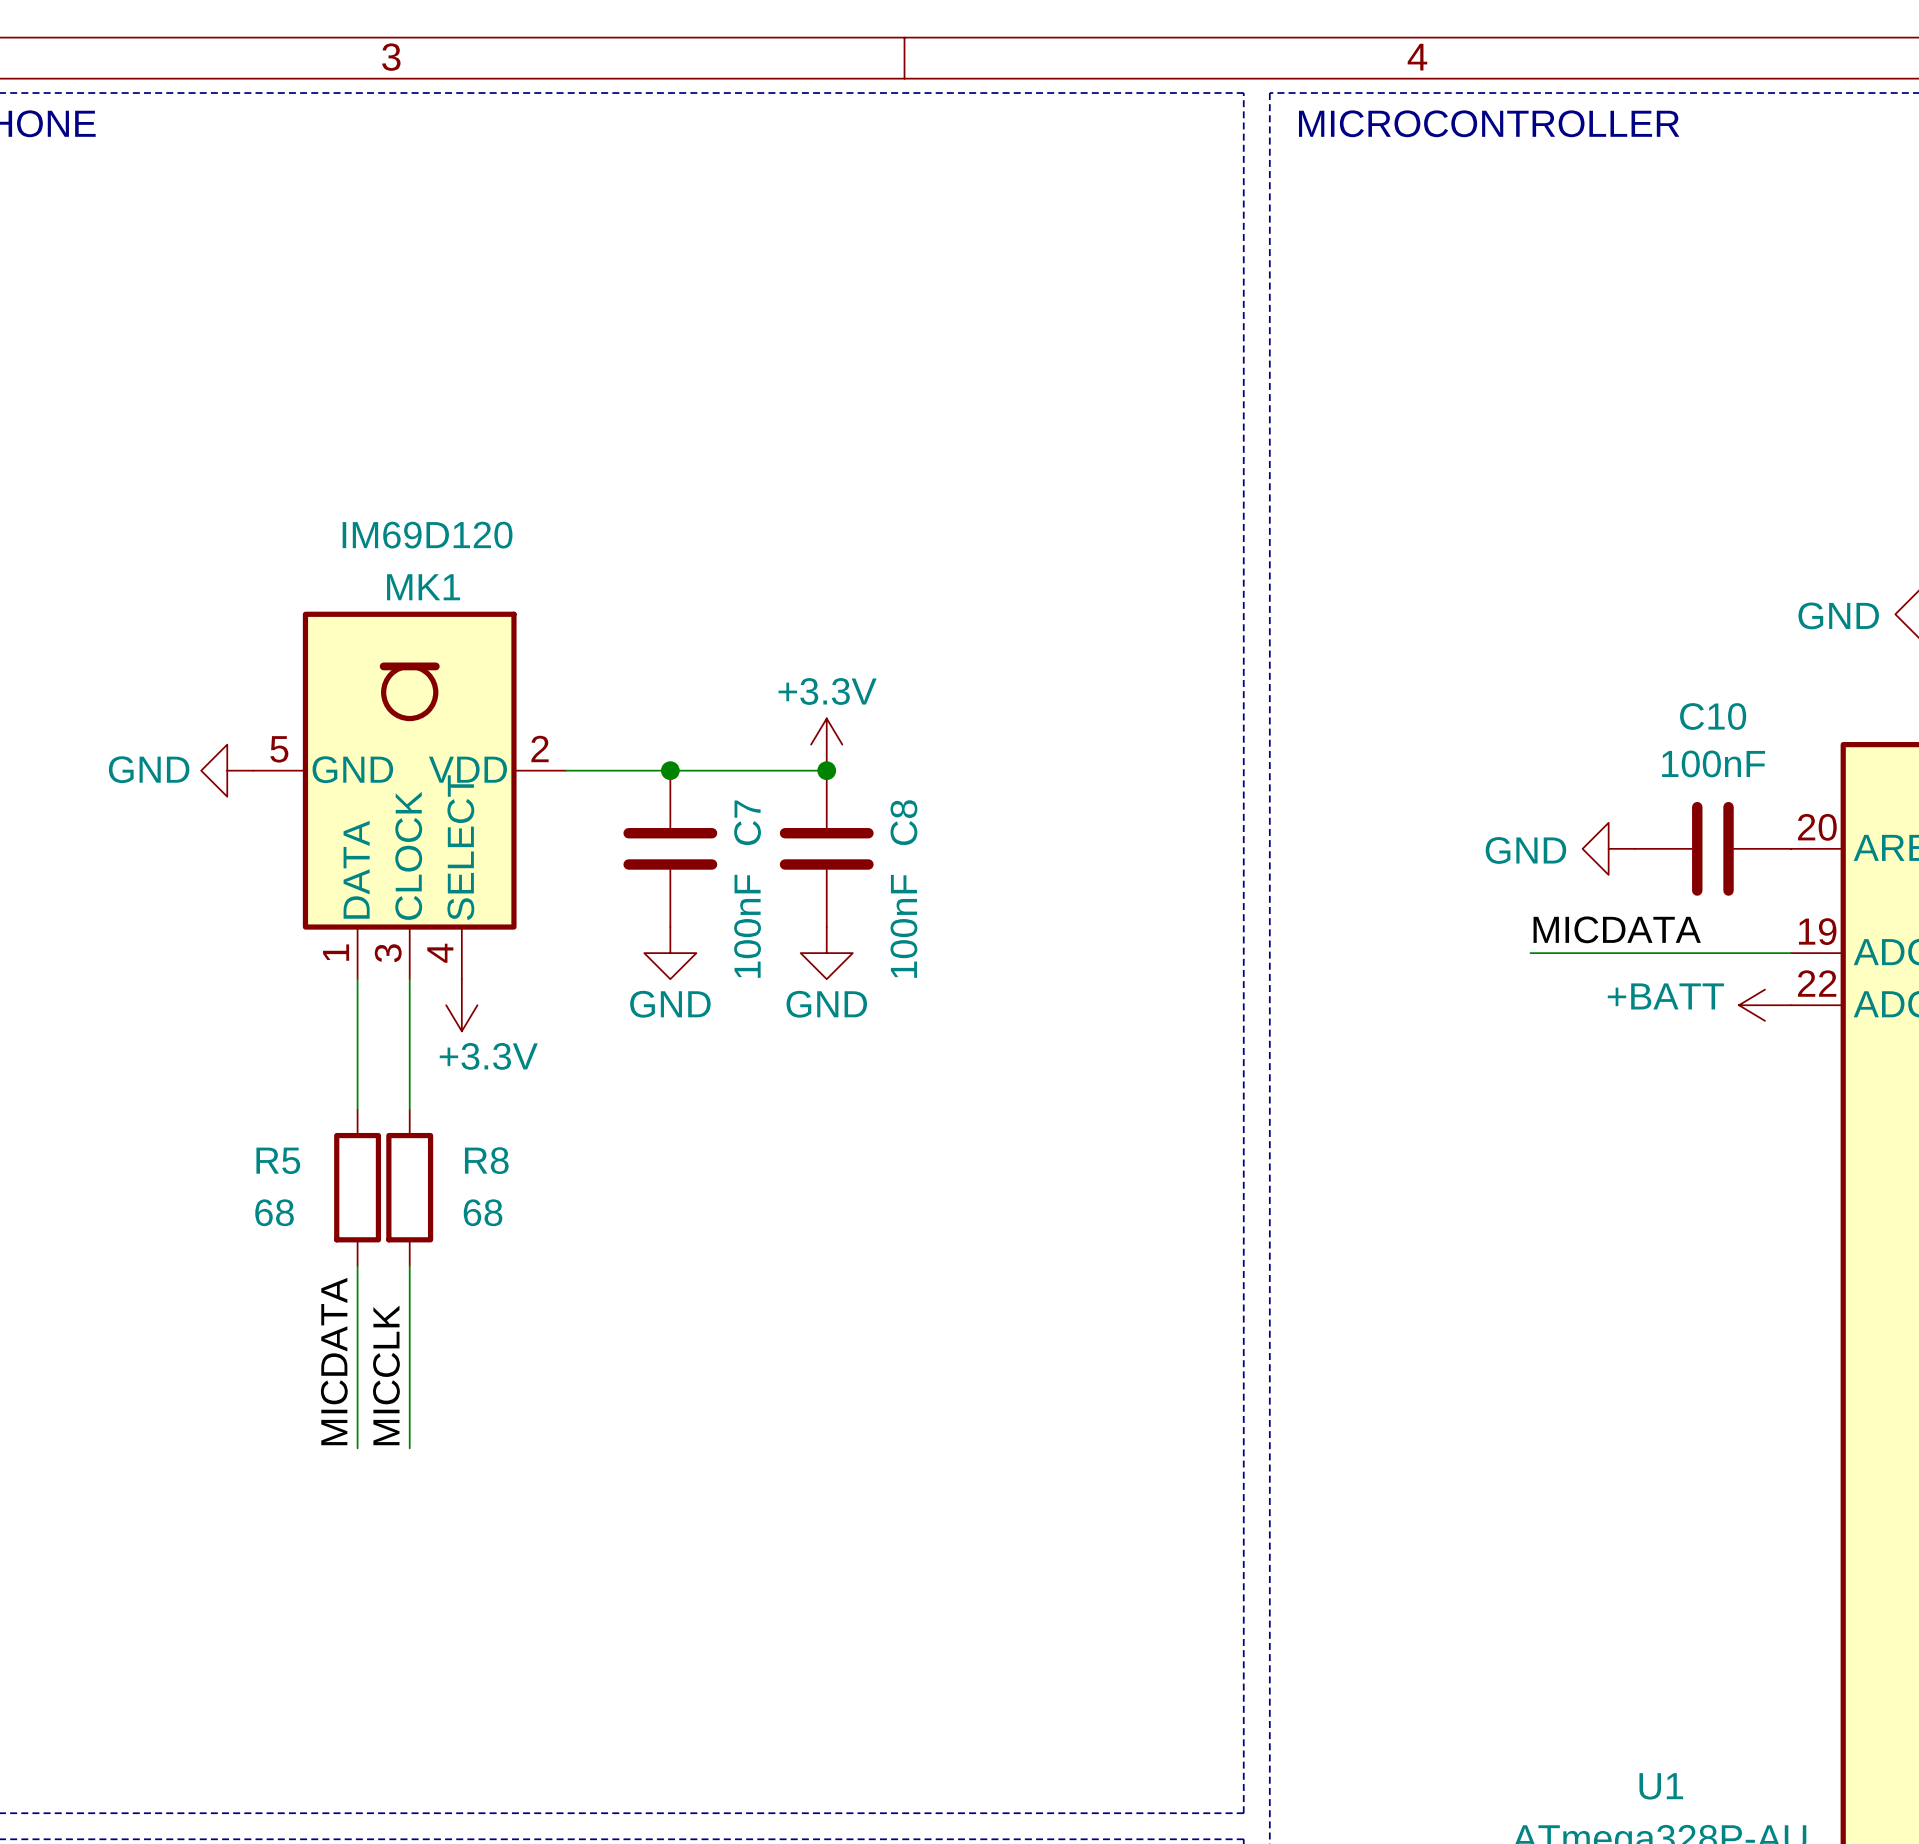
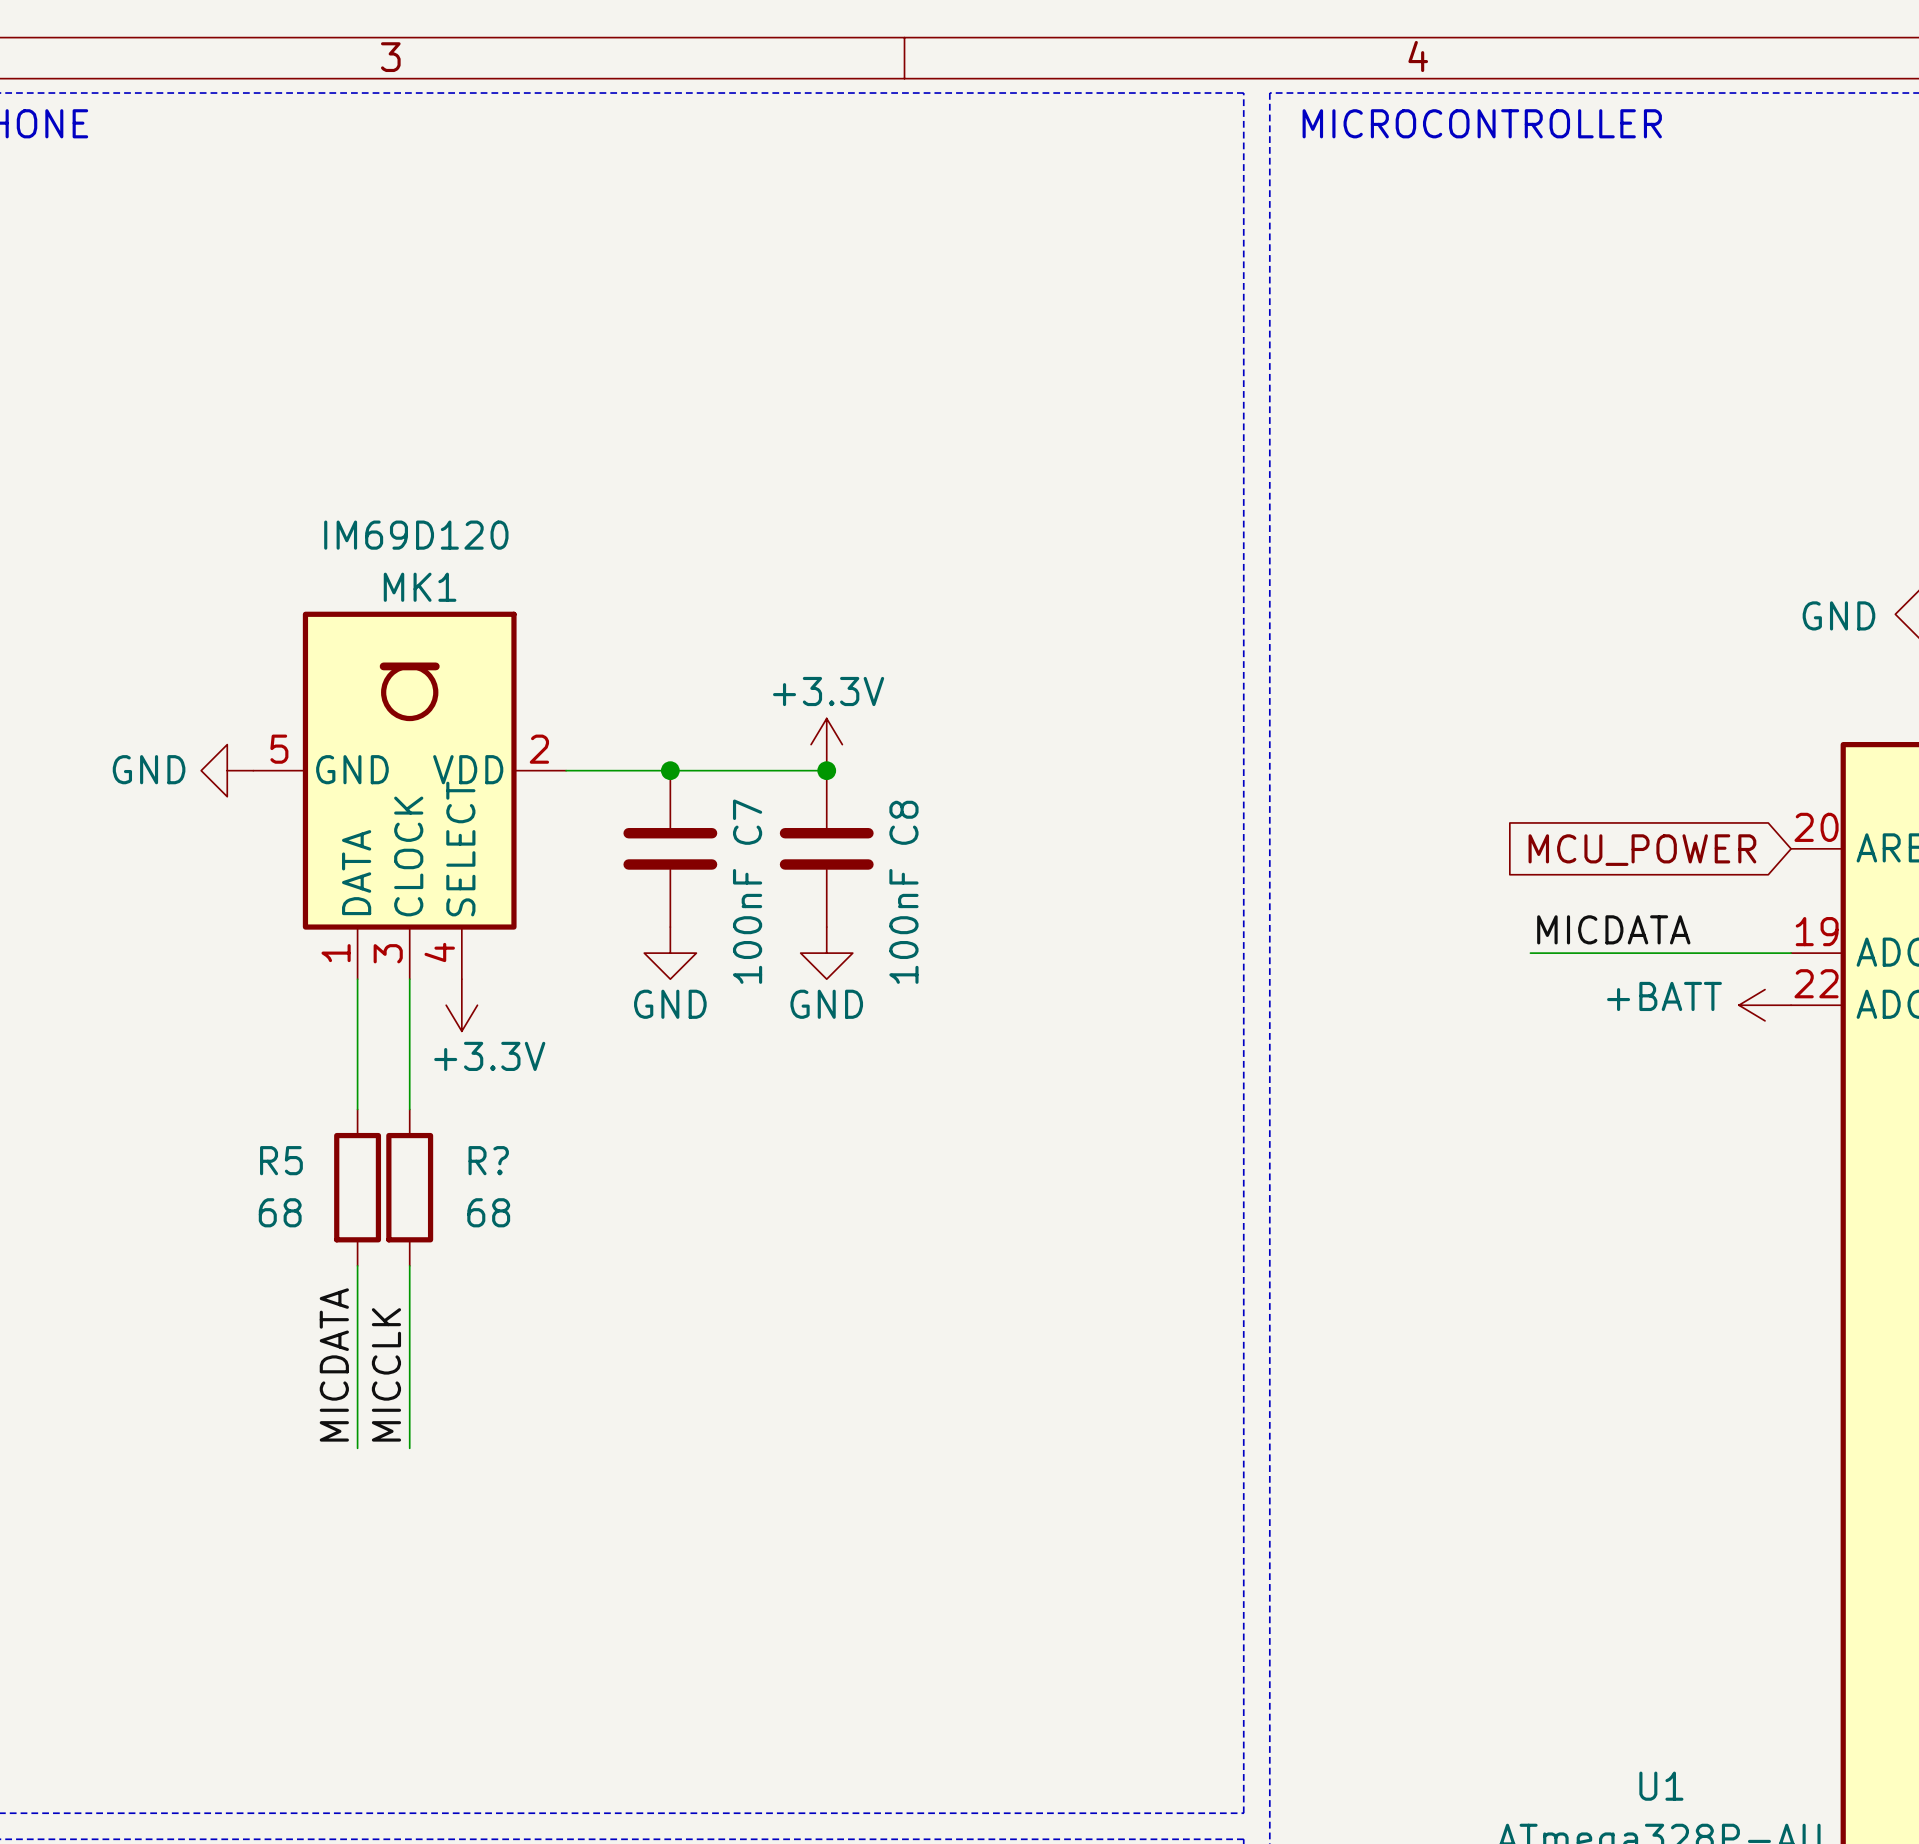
power symbol: GND (1608, 848) -> none
C10: 100nF (1712, 848) -> none
global label: none -> MCU_POWER (1642, 850)
R8 name: R8 (486, 1160) -> R? (488, 1160)

